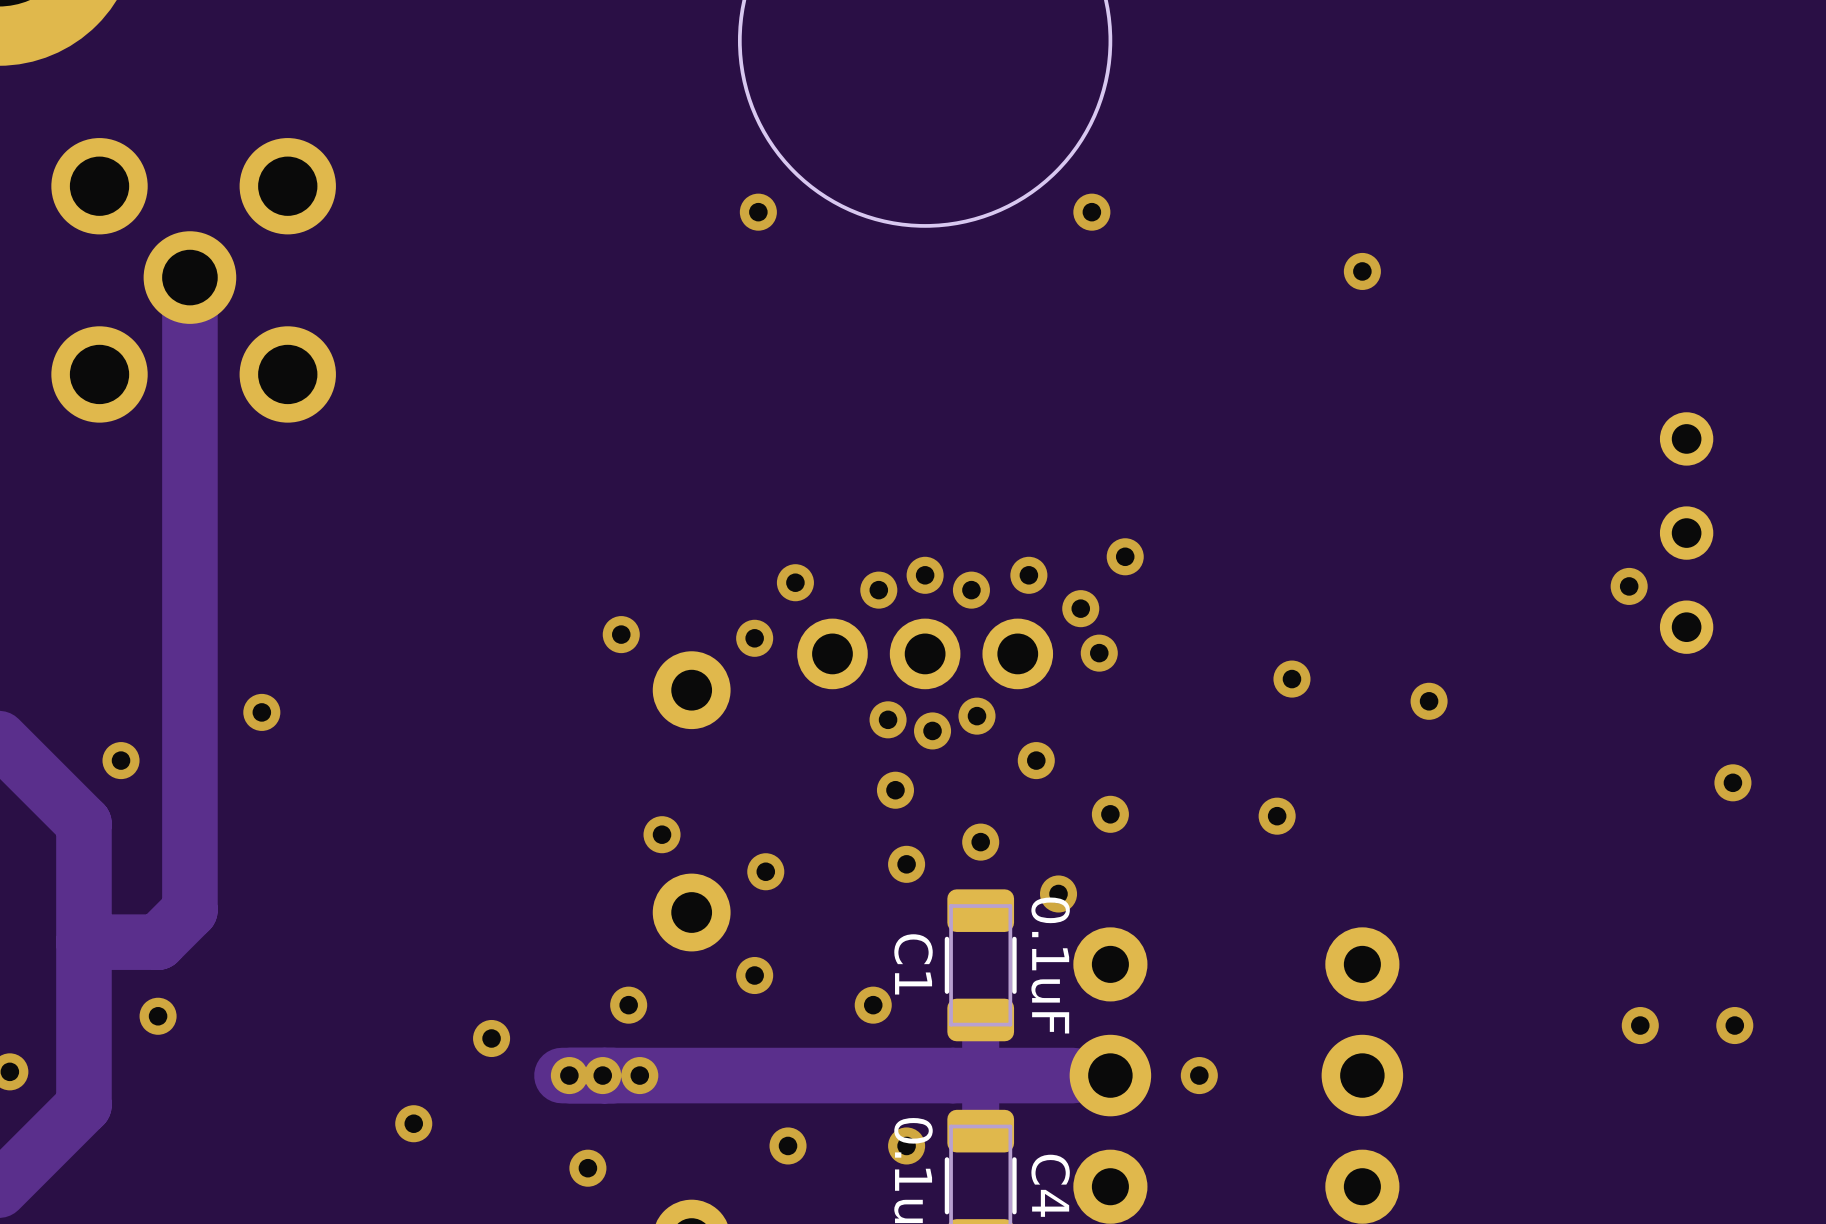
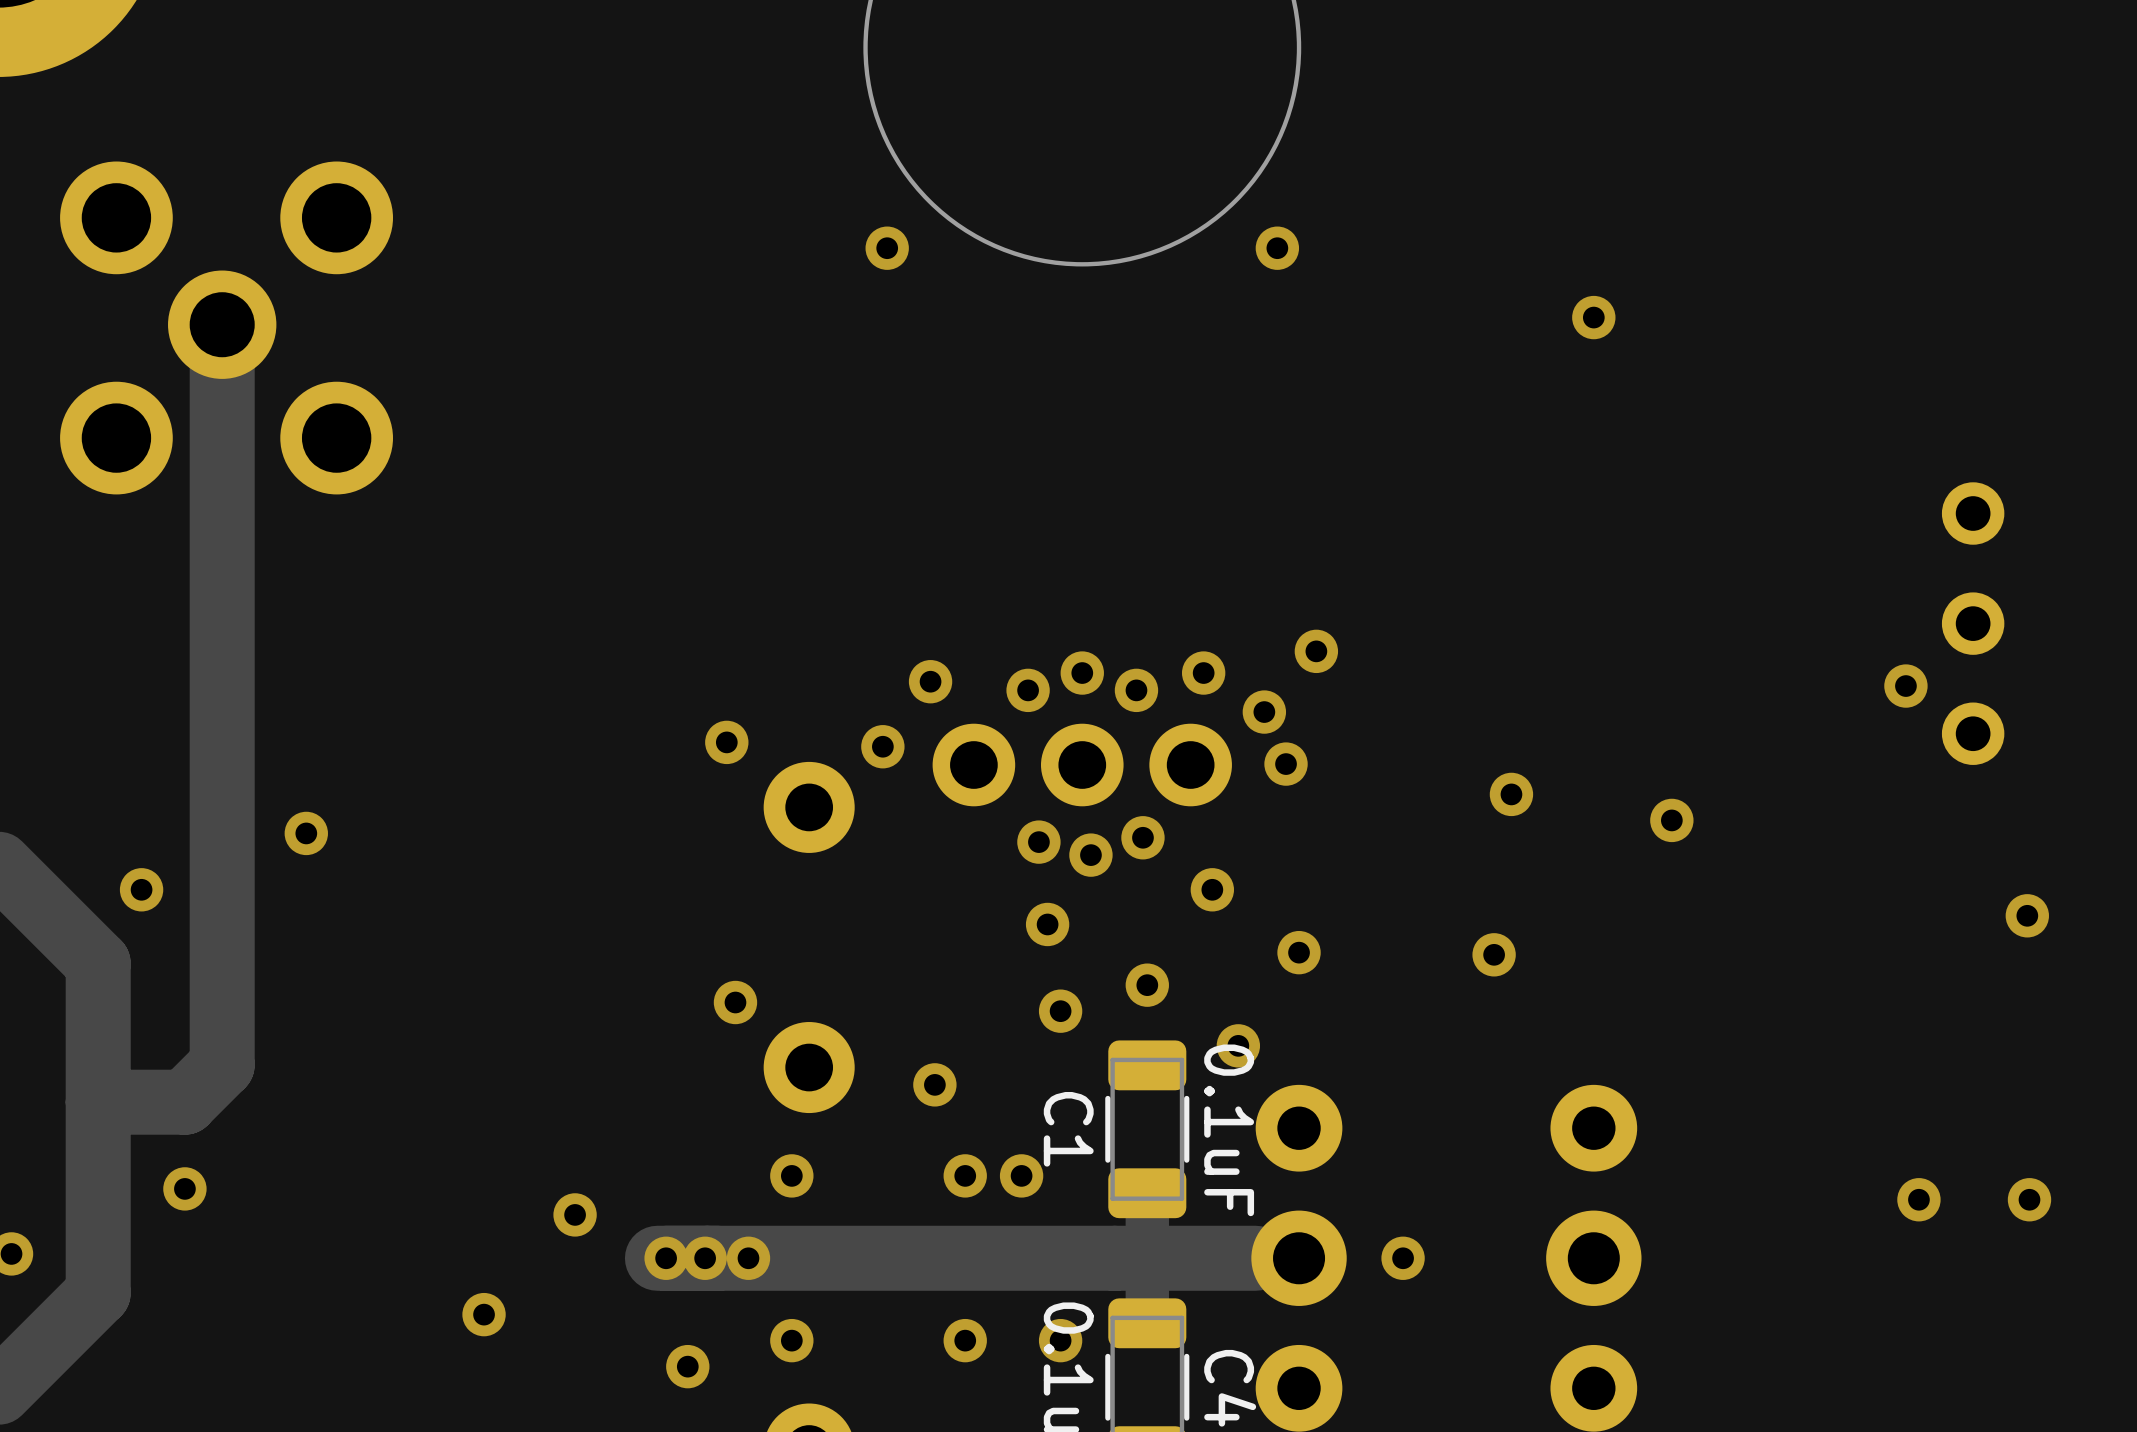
via position: (662, 834) -> (735, 1002)
via: (765, 871) -> none
via: none -> (934, 1084)
via: (754, 975) -> none
via: (628, 1005) -> none
via: none -> (791, 1175)
via: none -> (965, 1175)
via: none -> (791, 1340)
via position: (788, 1145) -> (965, 1340)

